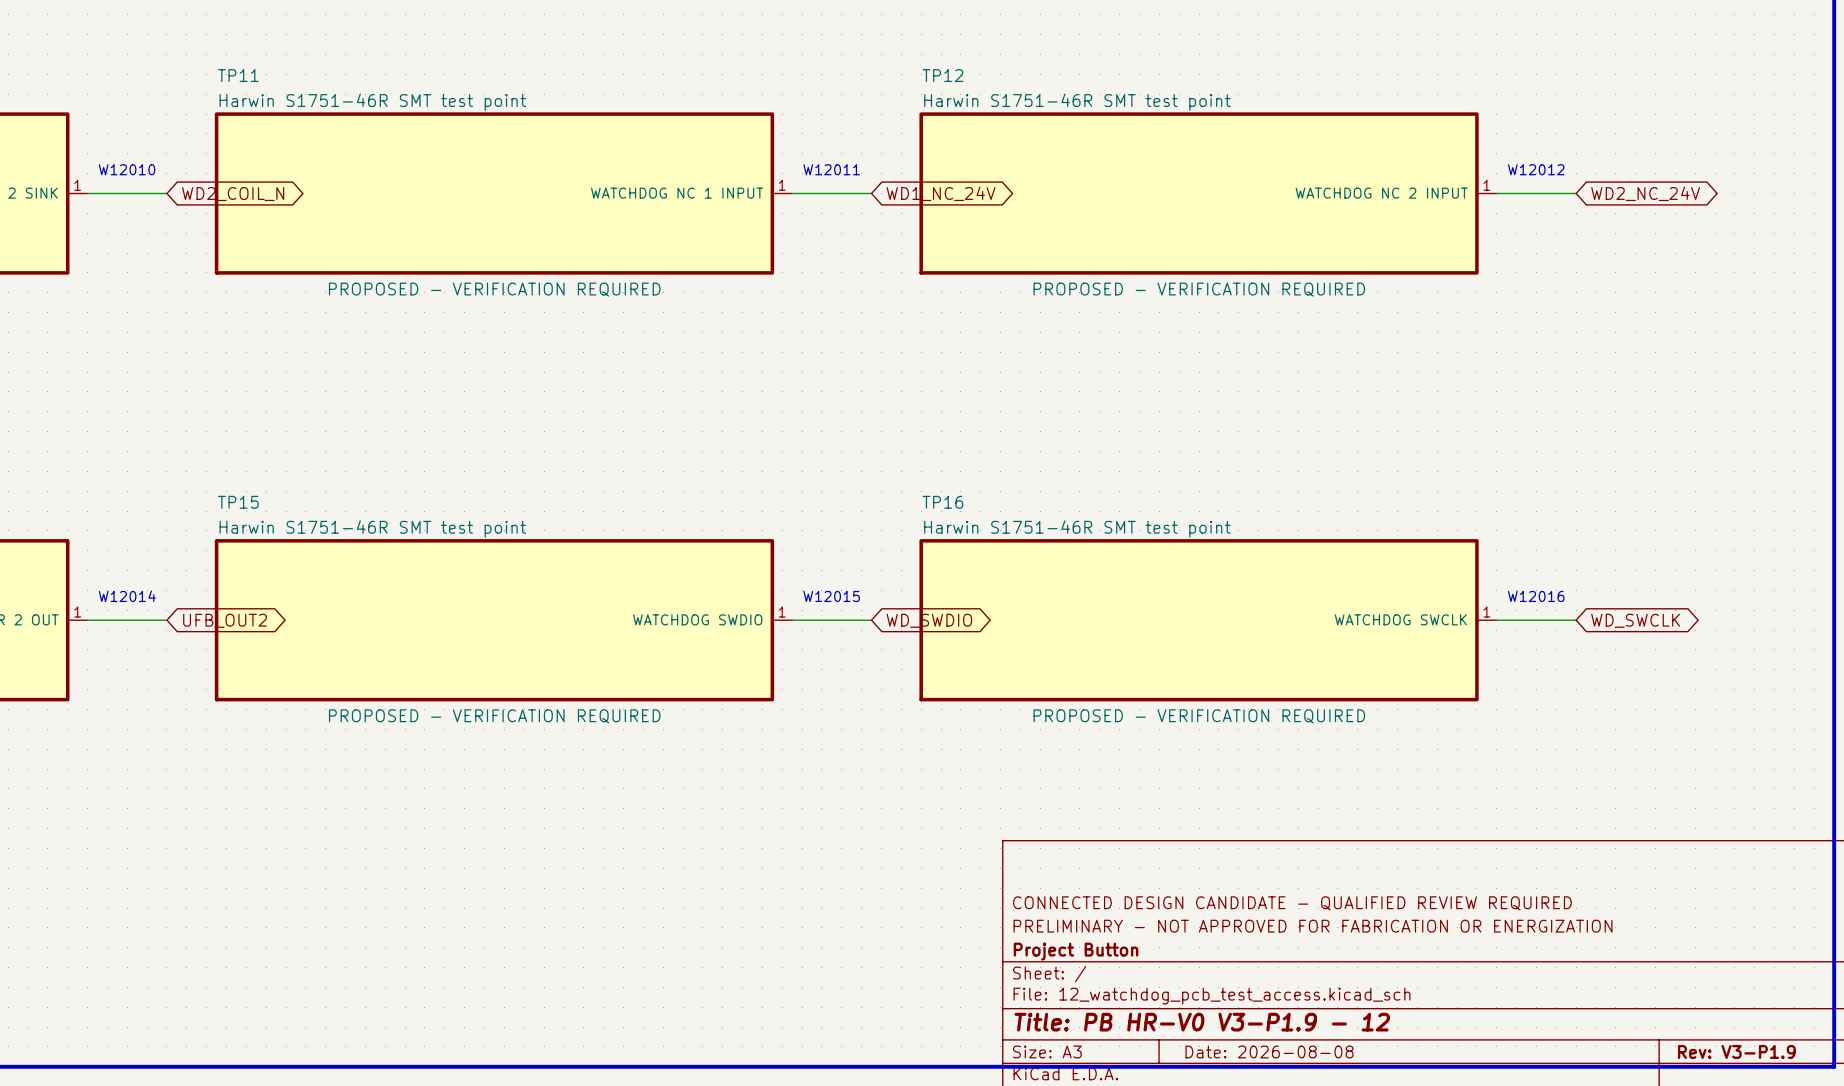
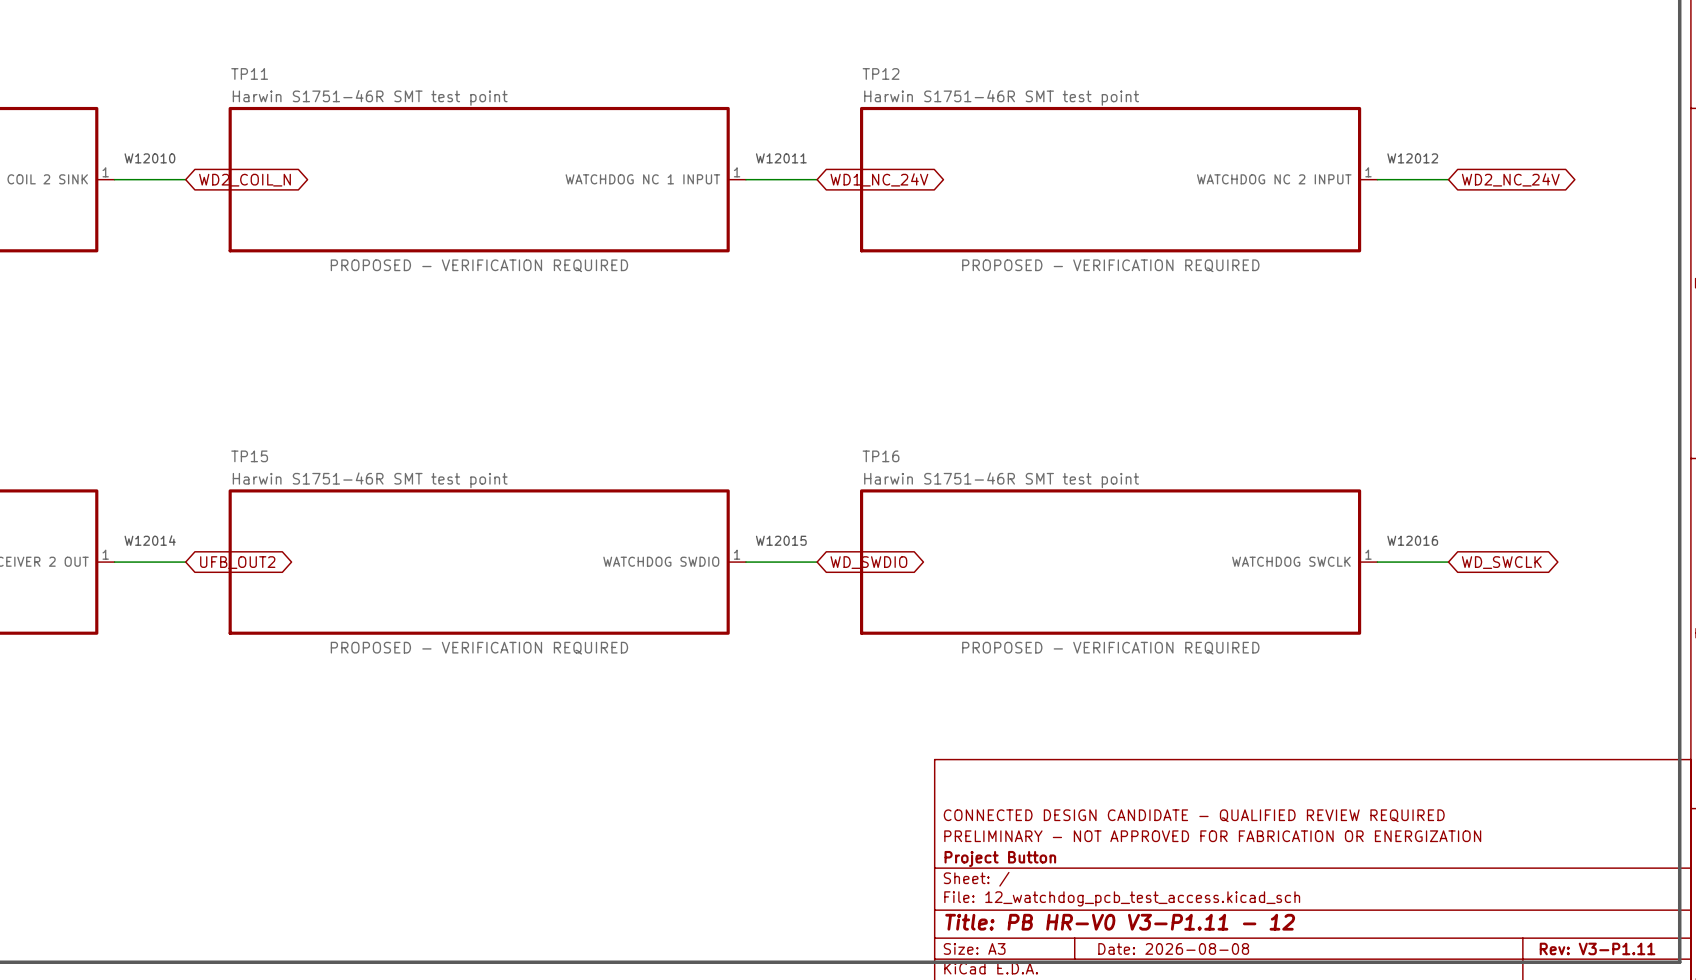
title block: Title: PB HR-V0 V3-P1.9 - 12 (1202, 1022) -> Title: PB HR-V0 V3-P1.11 - 12 (1120, 922)
title block: Rev: V3-P1.9 (1736, 1051) -> Rev: V3-P1.11 (1597, 948)

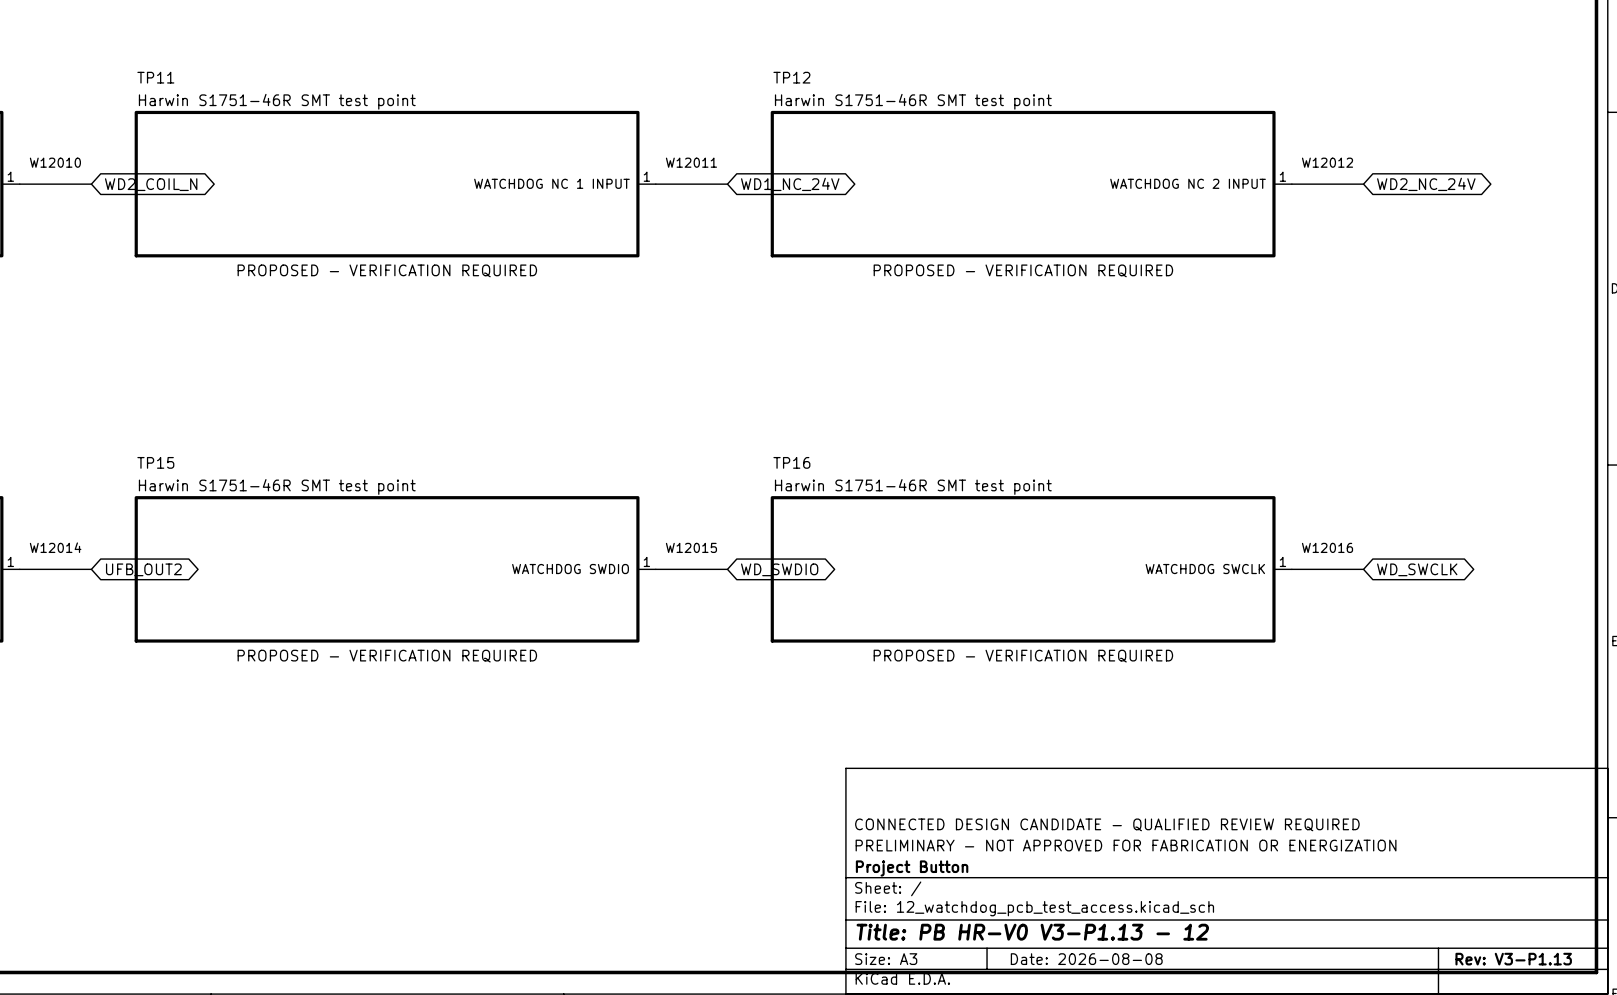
title block: Title: PB HR-V0 V3-P1.11 - 12 (1120, 922) -> Title: PB HR-V0 V3-P1.13 - 12 (1032, 932)
title block: Rev: V3-P1.11 (1597, 948) -> Rev: V3-P1.13 (1513, 959)

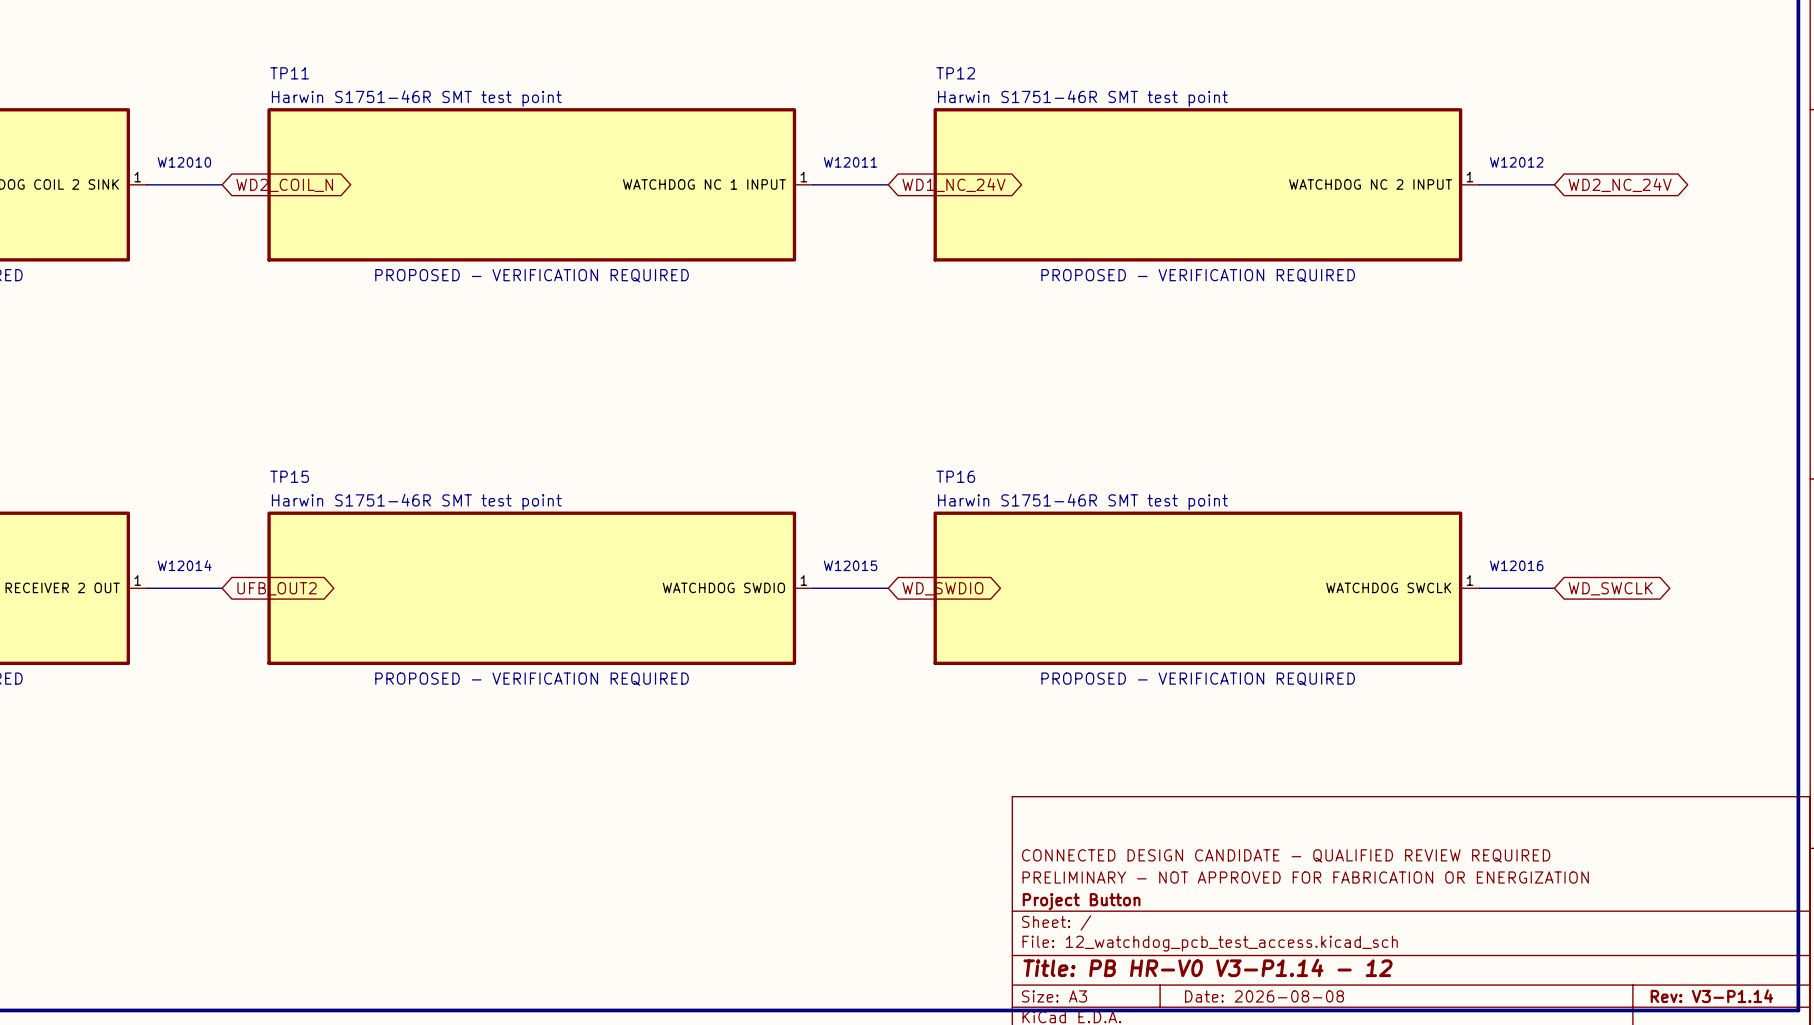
title block: Title: PB HR-V0 V3-P1.13 - 12 (1032, 932) -> Title: PB HR-V0 V3-P1.14 - 12 (1208, 967)
title block: Rev: V3-P1.13 (1513, 959) -> Rev: V3-P1.14 (1711, 996)

